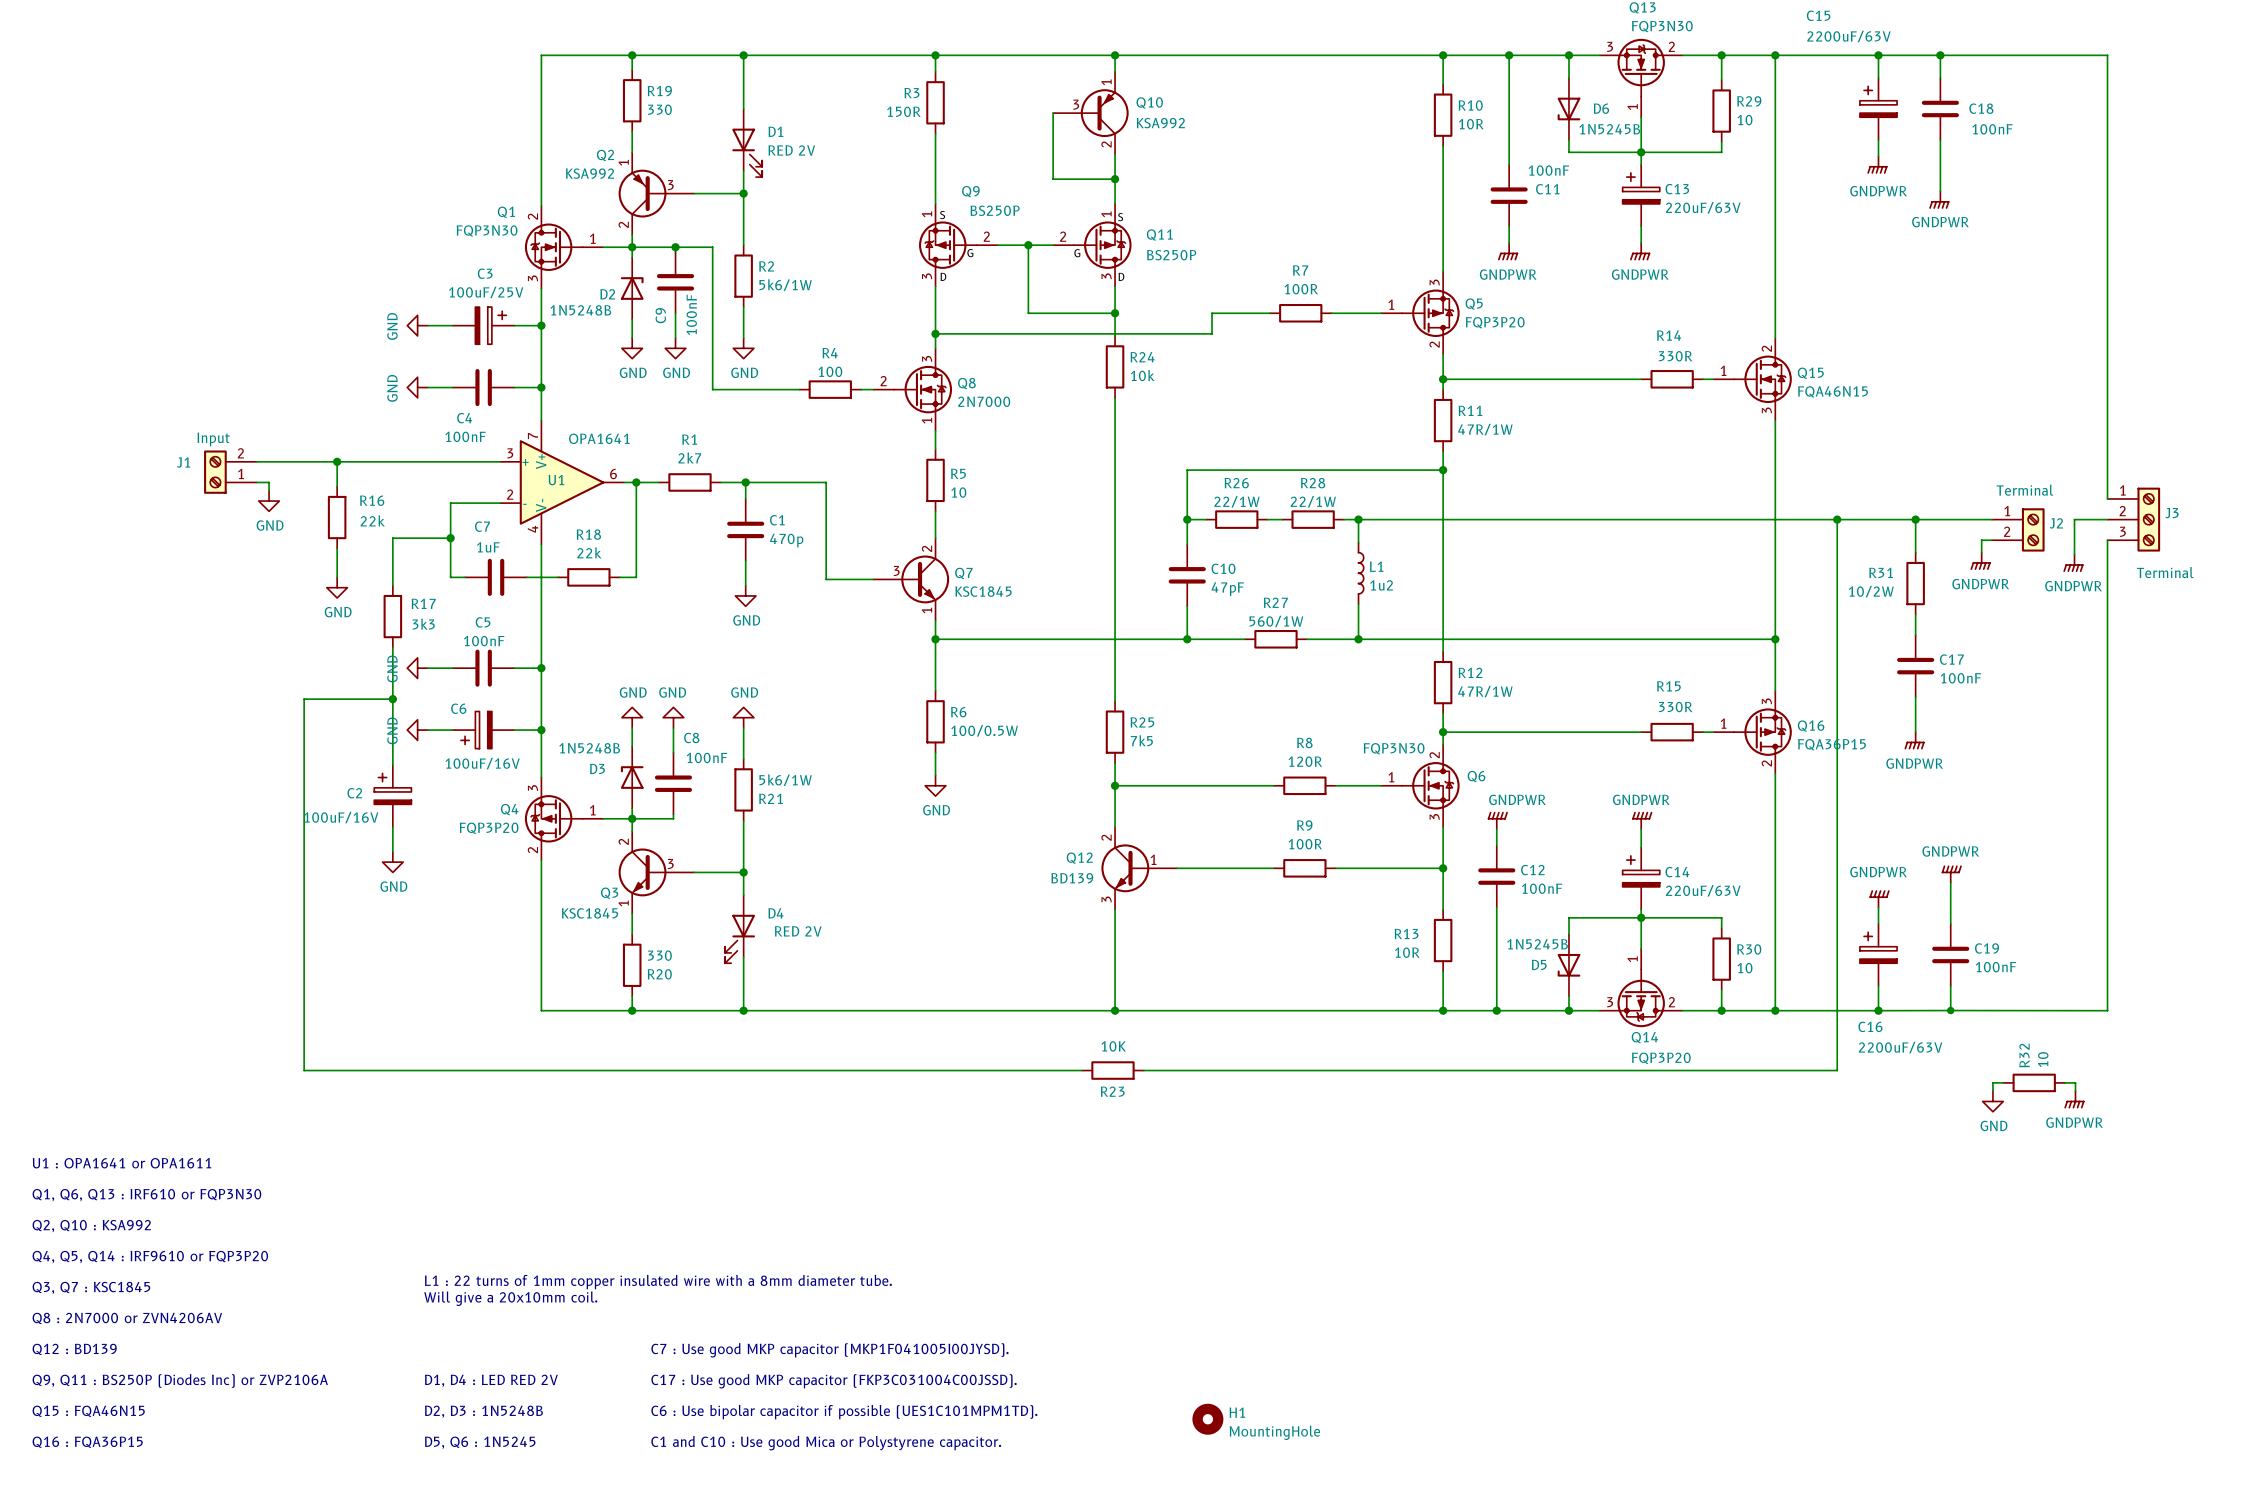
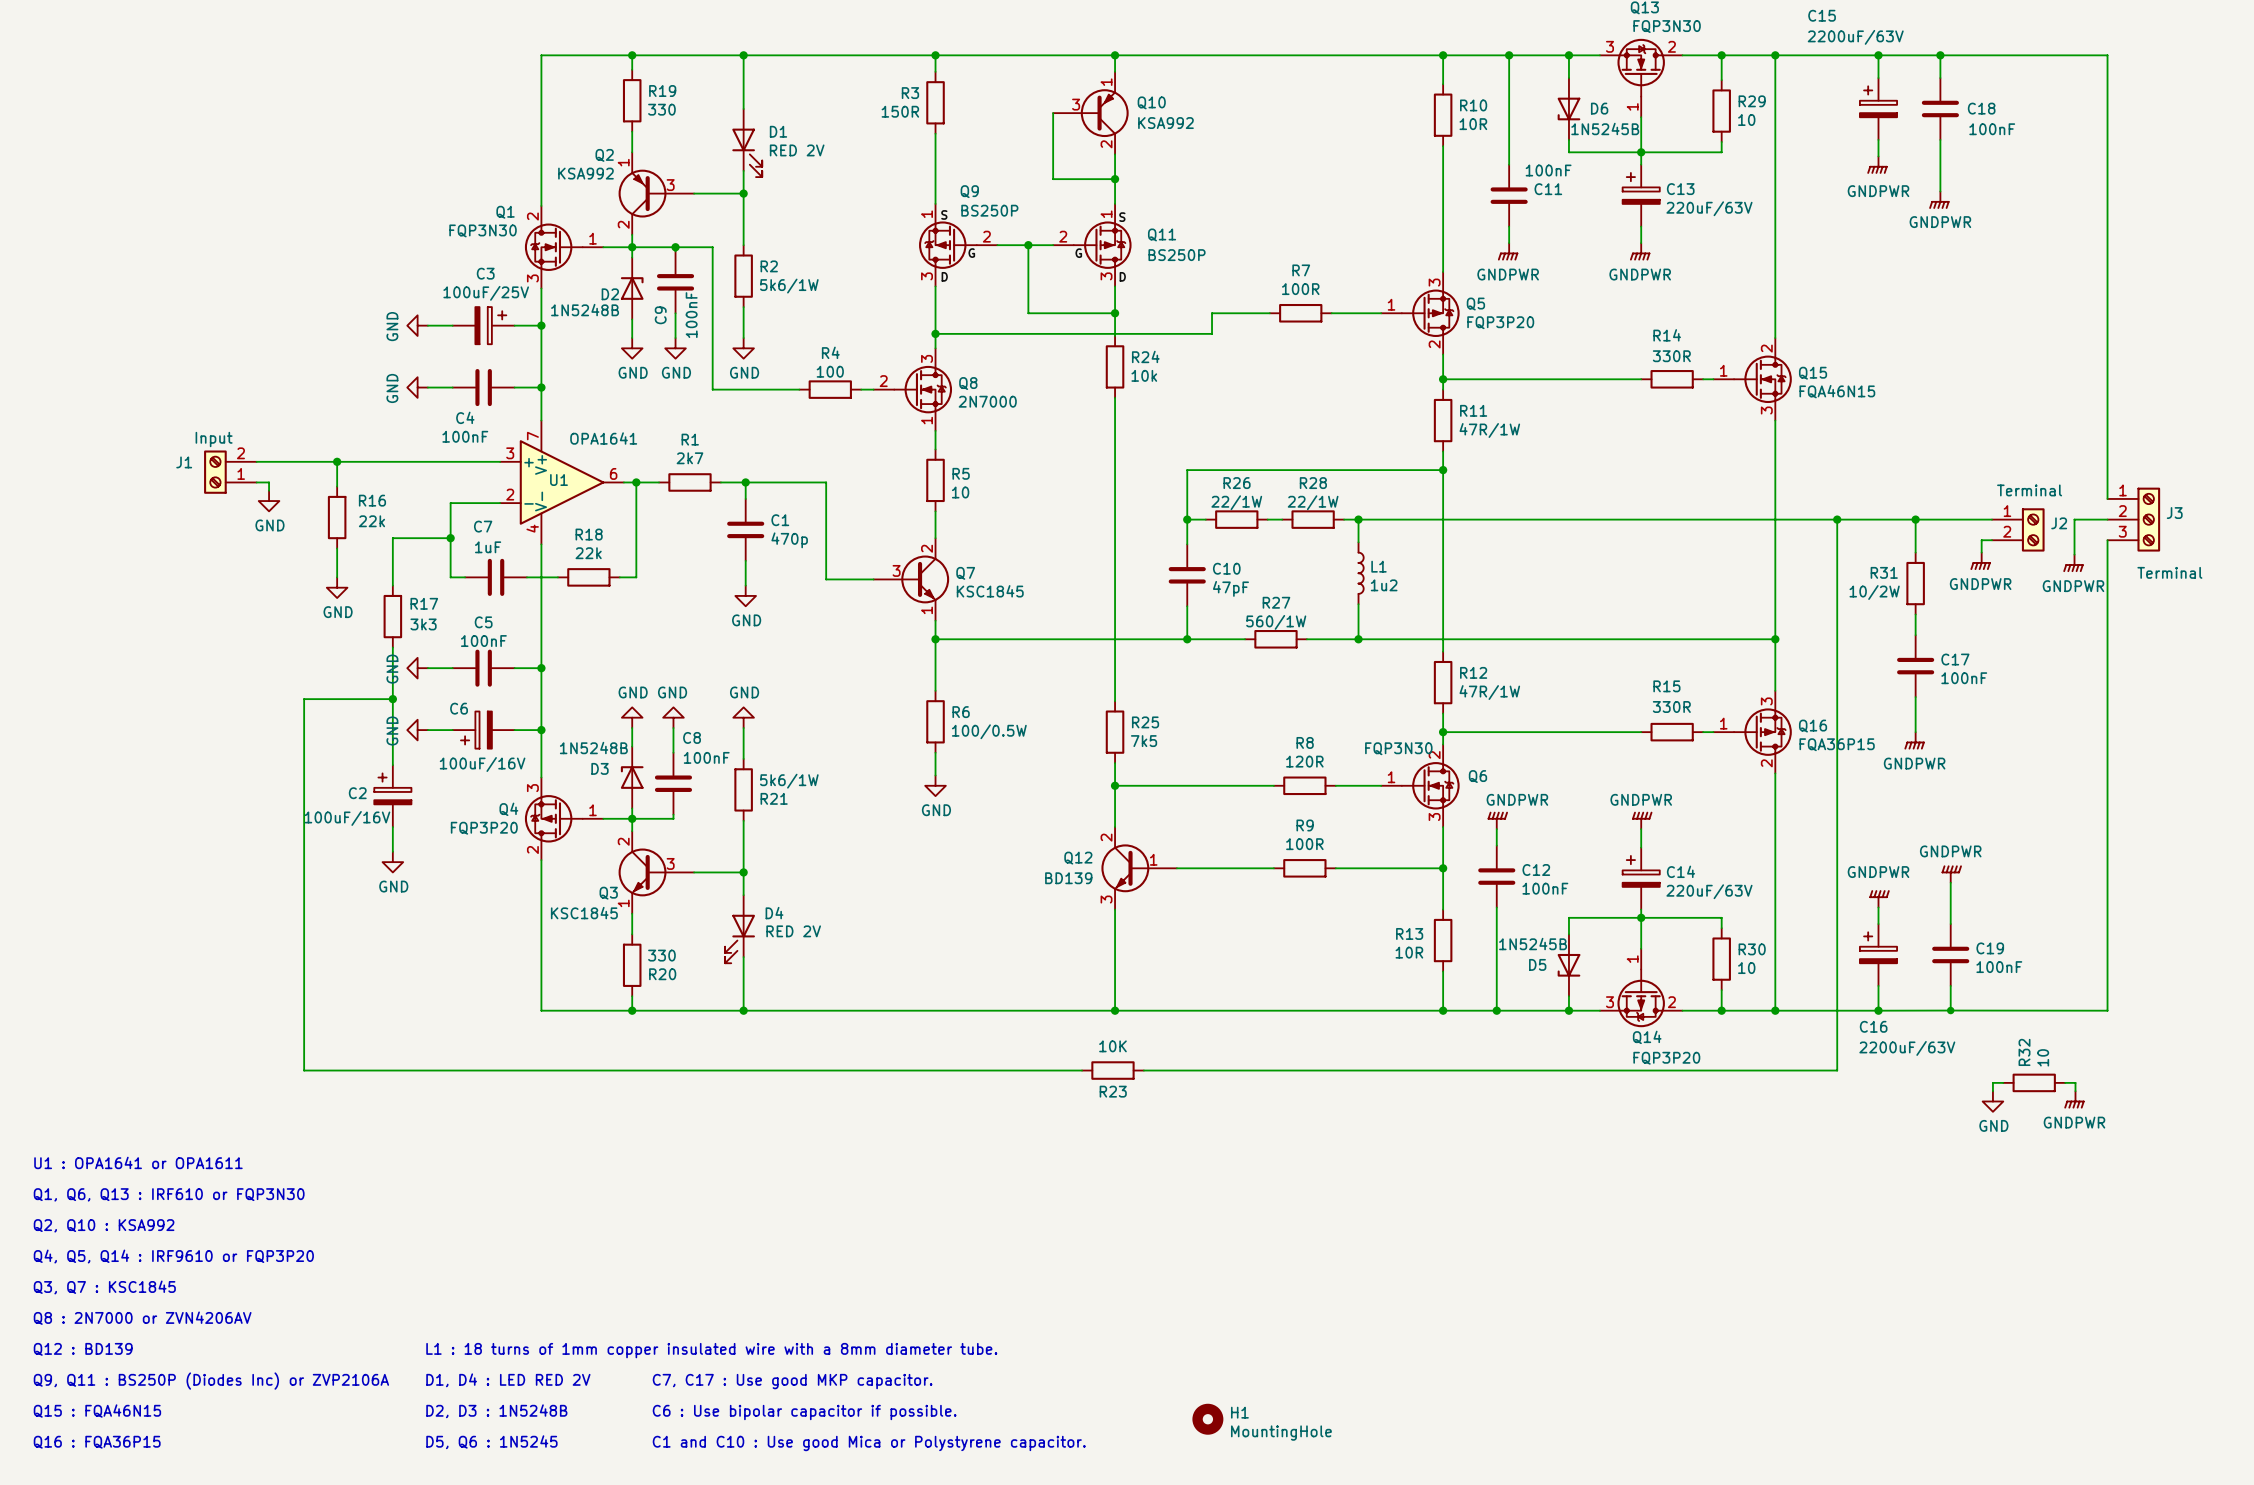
text: L1 : 22 turns of 1mm copper insulated wire with a 8mm diameter tube. (658, 1282) -> none
text: Will give a 20x10mm coil. (510, 1298) -> none
text: none -> L1 : 18 turns of 1mm copper insulated wire with a 8mm diameter tube. (711, 1350)
text: C7 : Use good MKP capacitor (MKP1F041005I00JYSD). (829, 1350) -> none
text: C17 : Use good MKP capacitor (FKP3C031004C00JSSD). (834, 1381) -> C7, C17 : Use good MKP capacitor. (792, 1381)
text: C6 : Use bipolar capacitor if possible (UES1C101MPM1TD). (844, 1412) -> C6 : Use bipolar capacitor if possible. (804, 1412)

